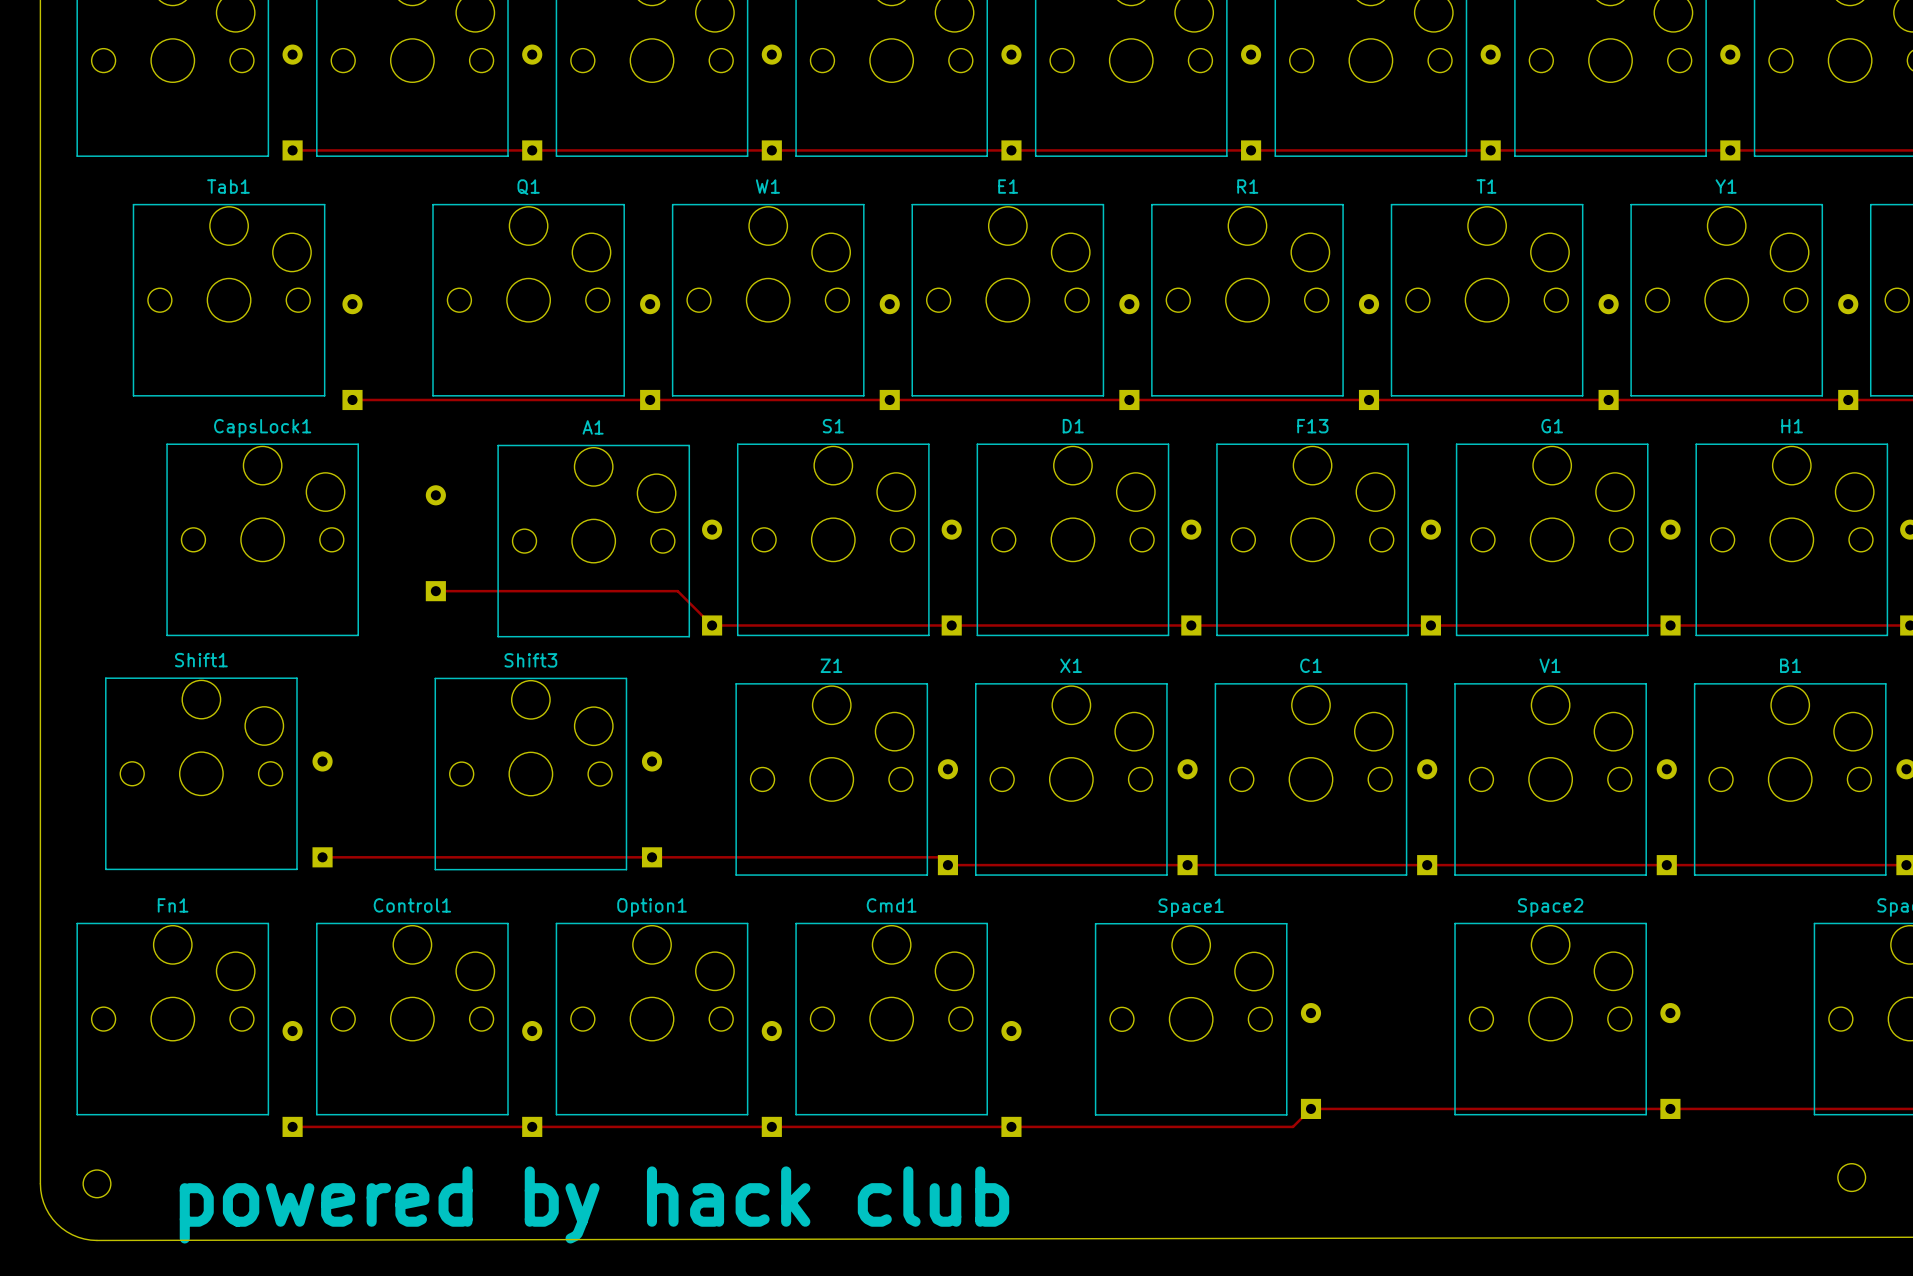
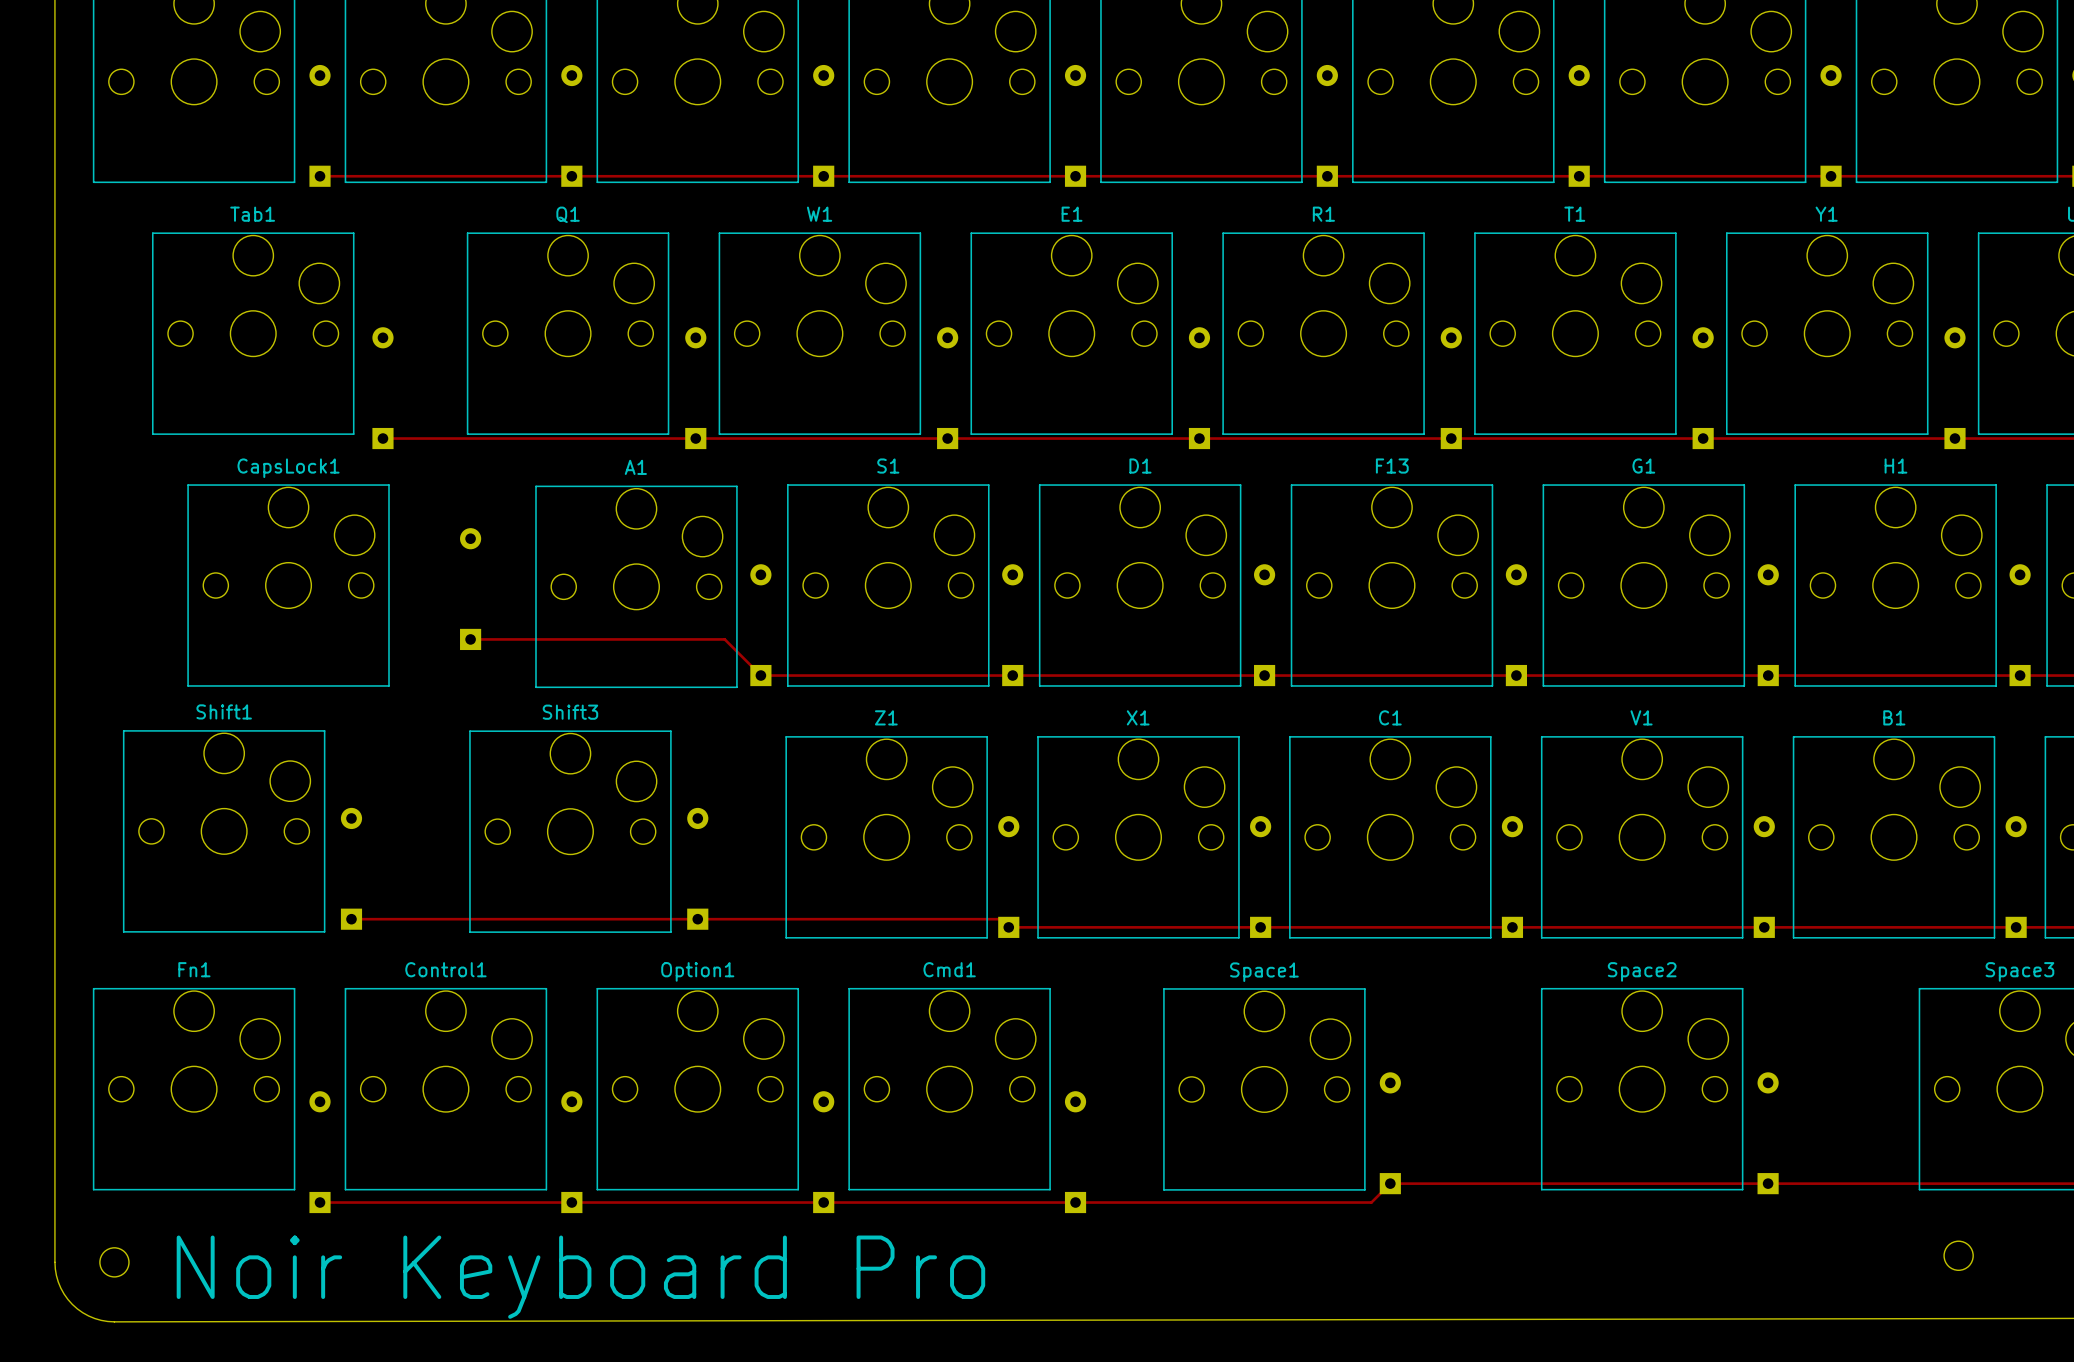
text: none -> Noir Keyboard Pro (580, 1277)
text: powered by hack club (594, 1204) -> none

